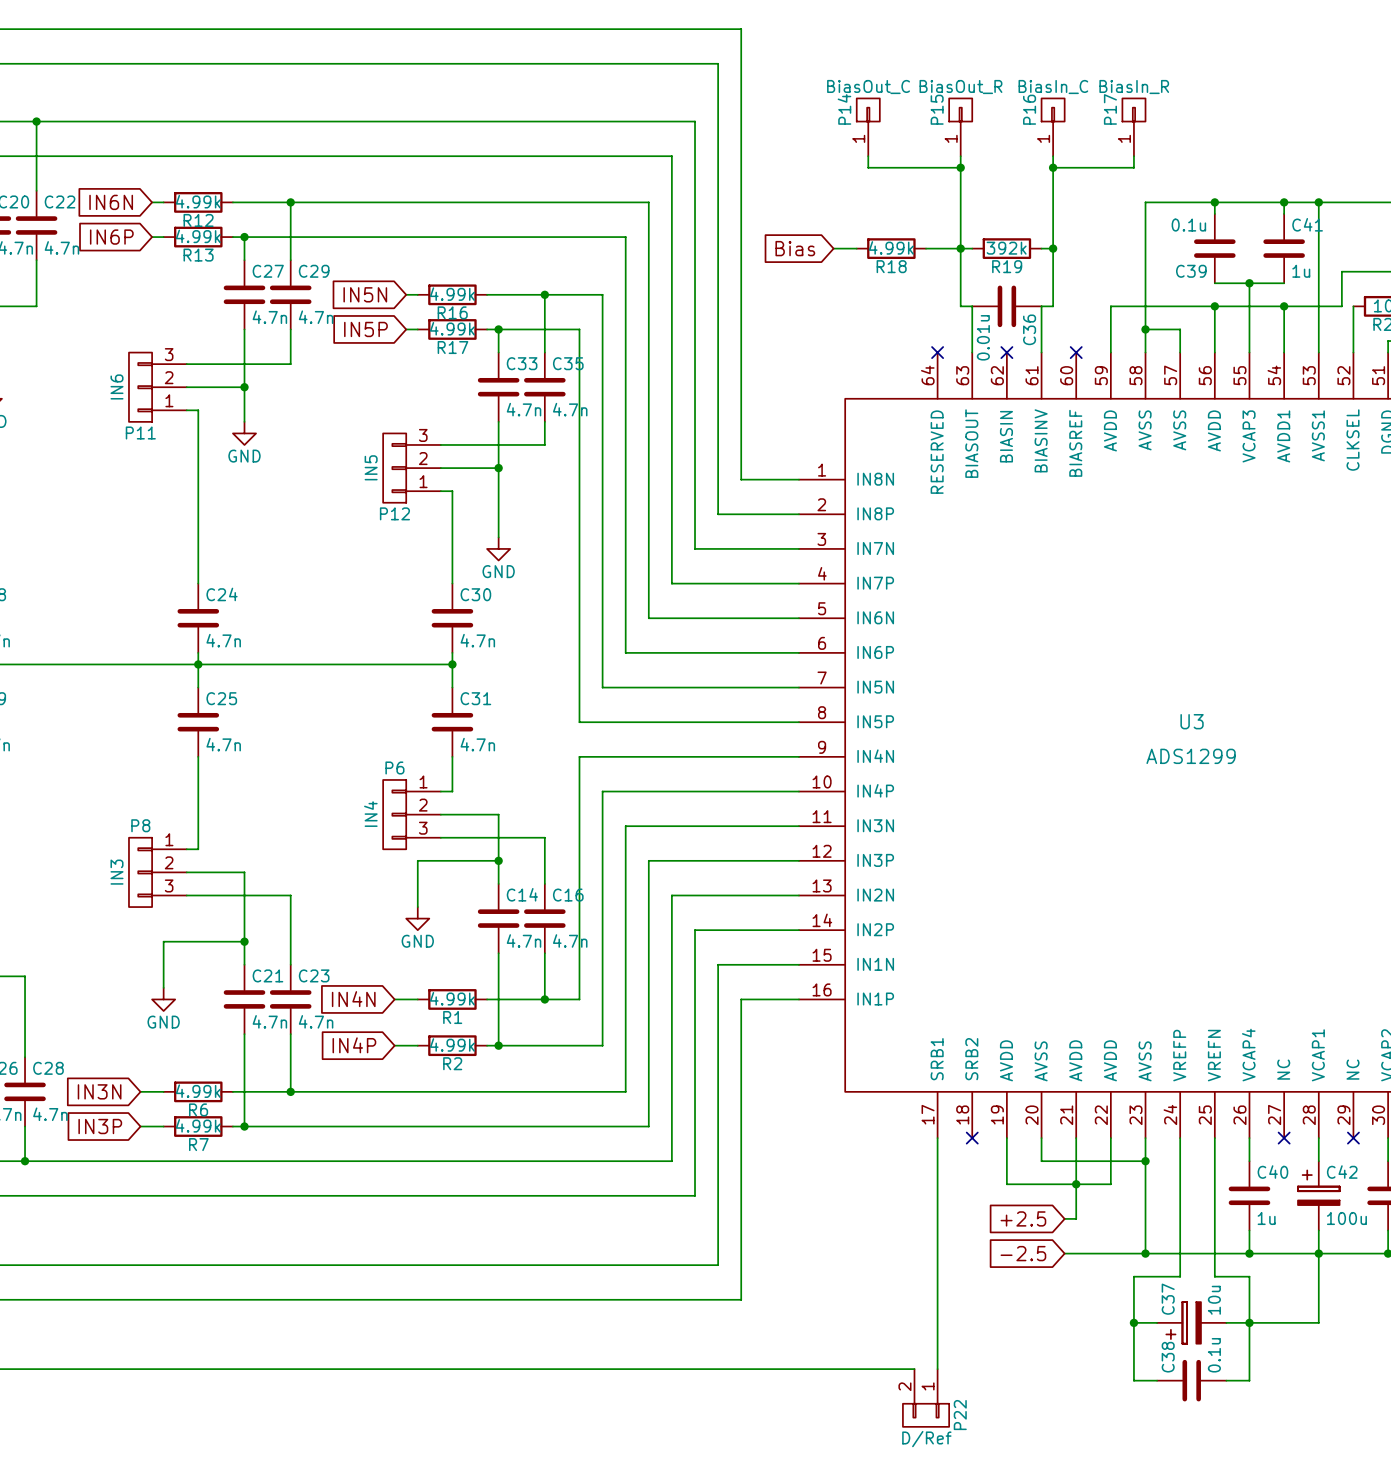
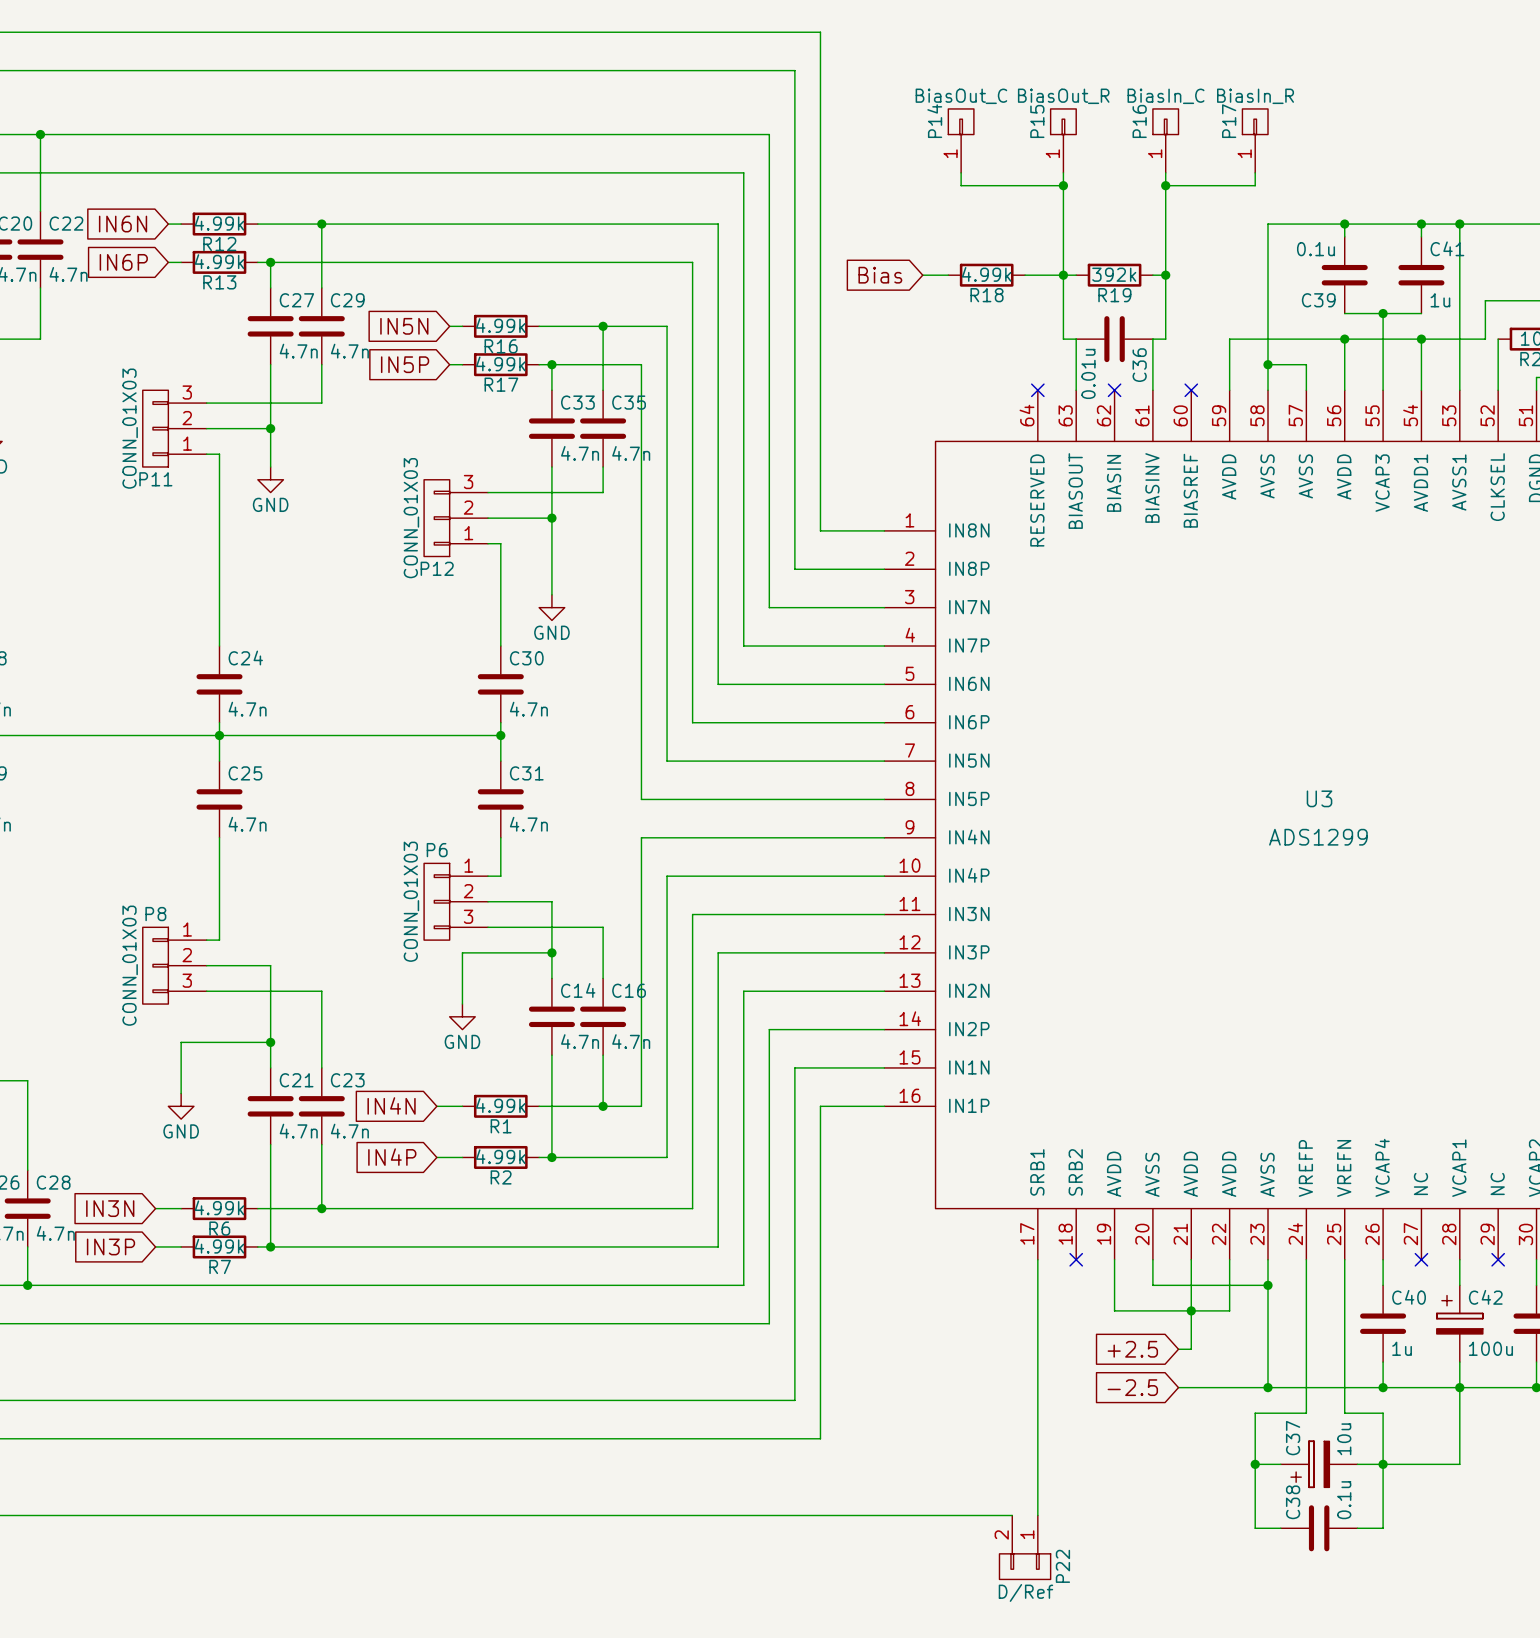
P11 value: IN6 (117, 386) -> CONN_01X03 (130, 428)
P12 value: IN5 (371, 467) -> CONN_01X03 (411, 518)
P6 value: IN4 (370, 814) -> CONN_01X03 (411, 901)
P8 value: IN3 (117, 872) -> CONN_01X03 (130, 965)

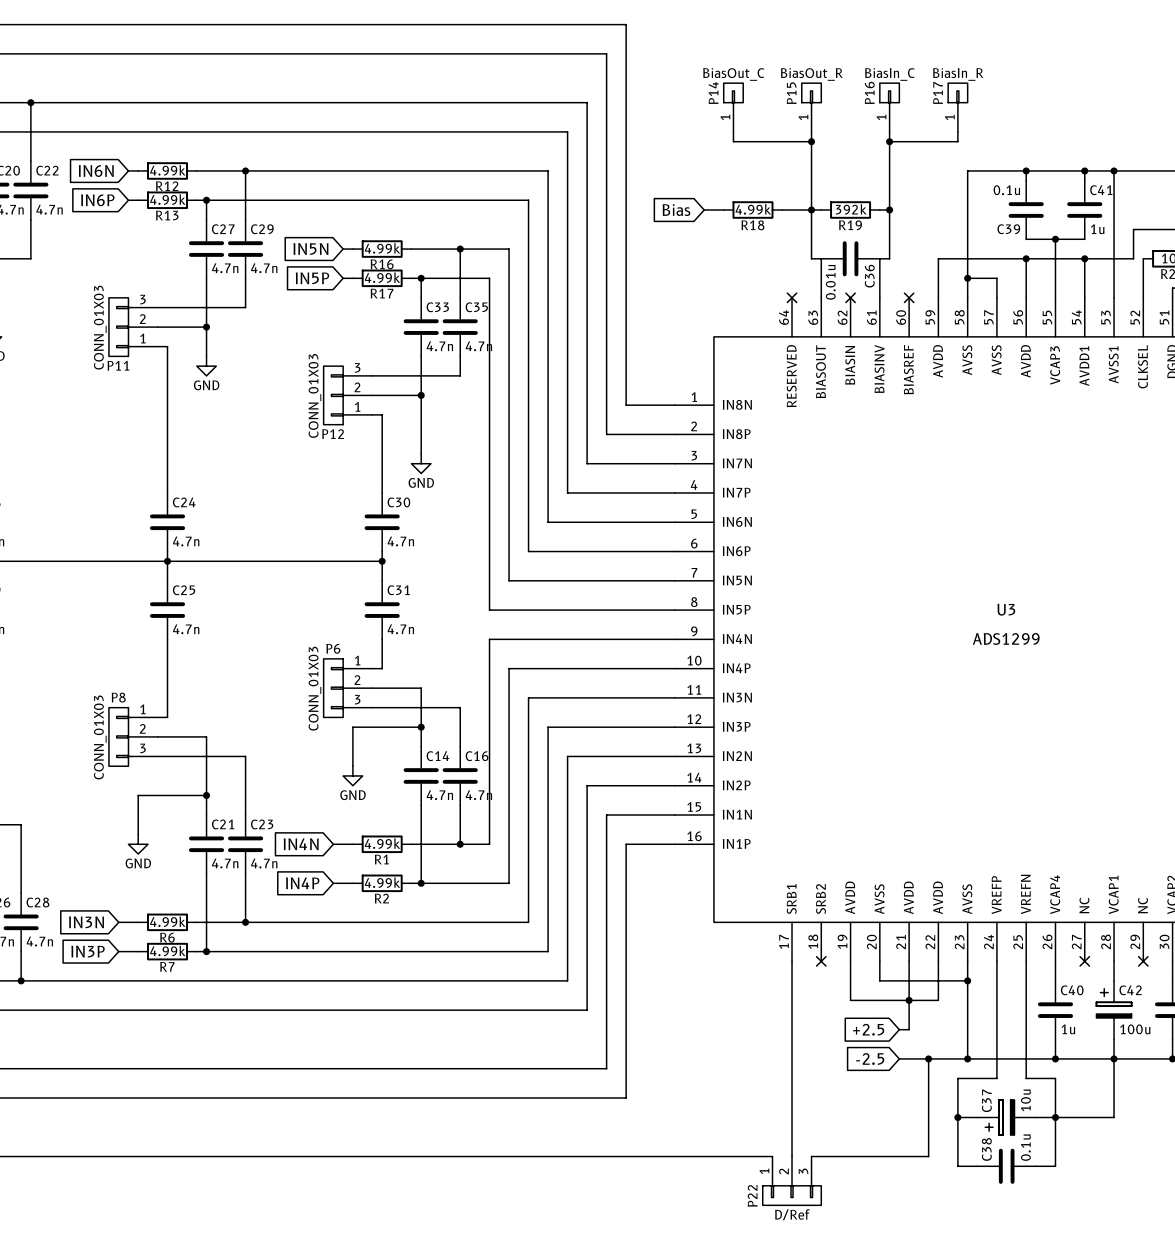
wire: none -> (928, 1058) (928, 1156) (811, 1156)
junction: none -> (928, 1058)
P22 symbol: [999, 1515, 1051, 1580] -> [762, 1156, 822, 1206]
P22 name position: P22 (1062, 1566) -> P22 (752, 1195)

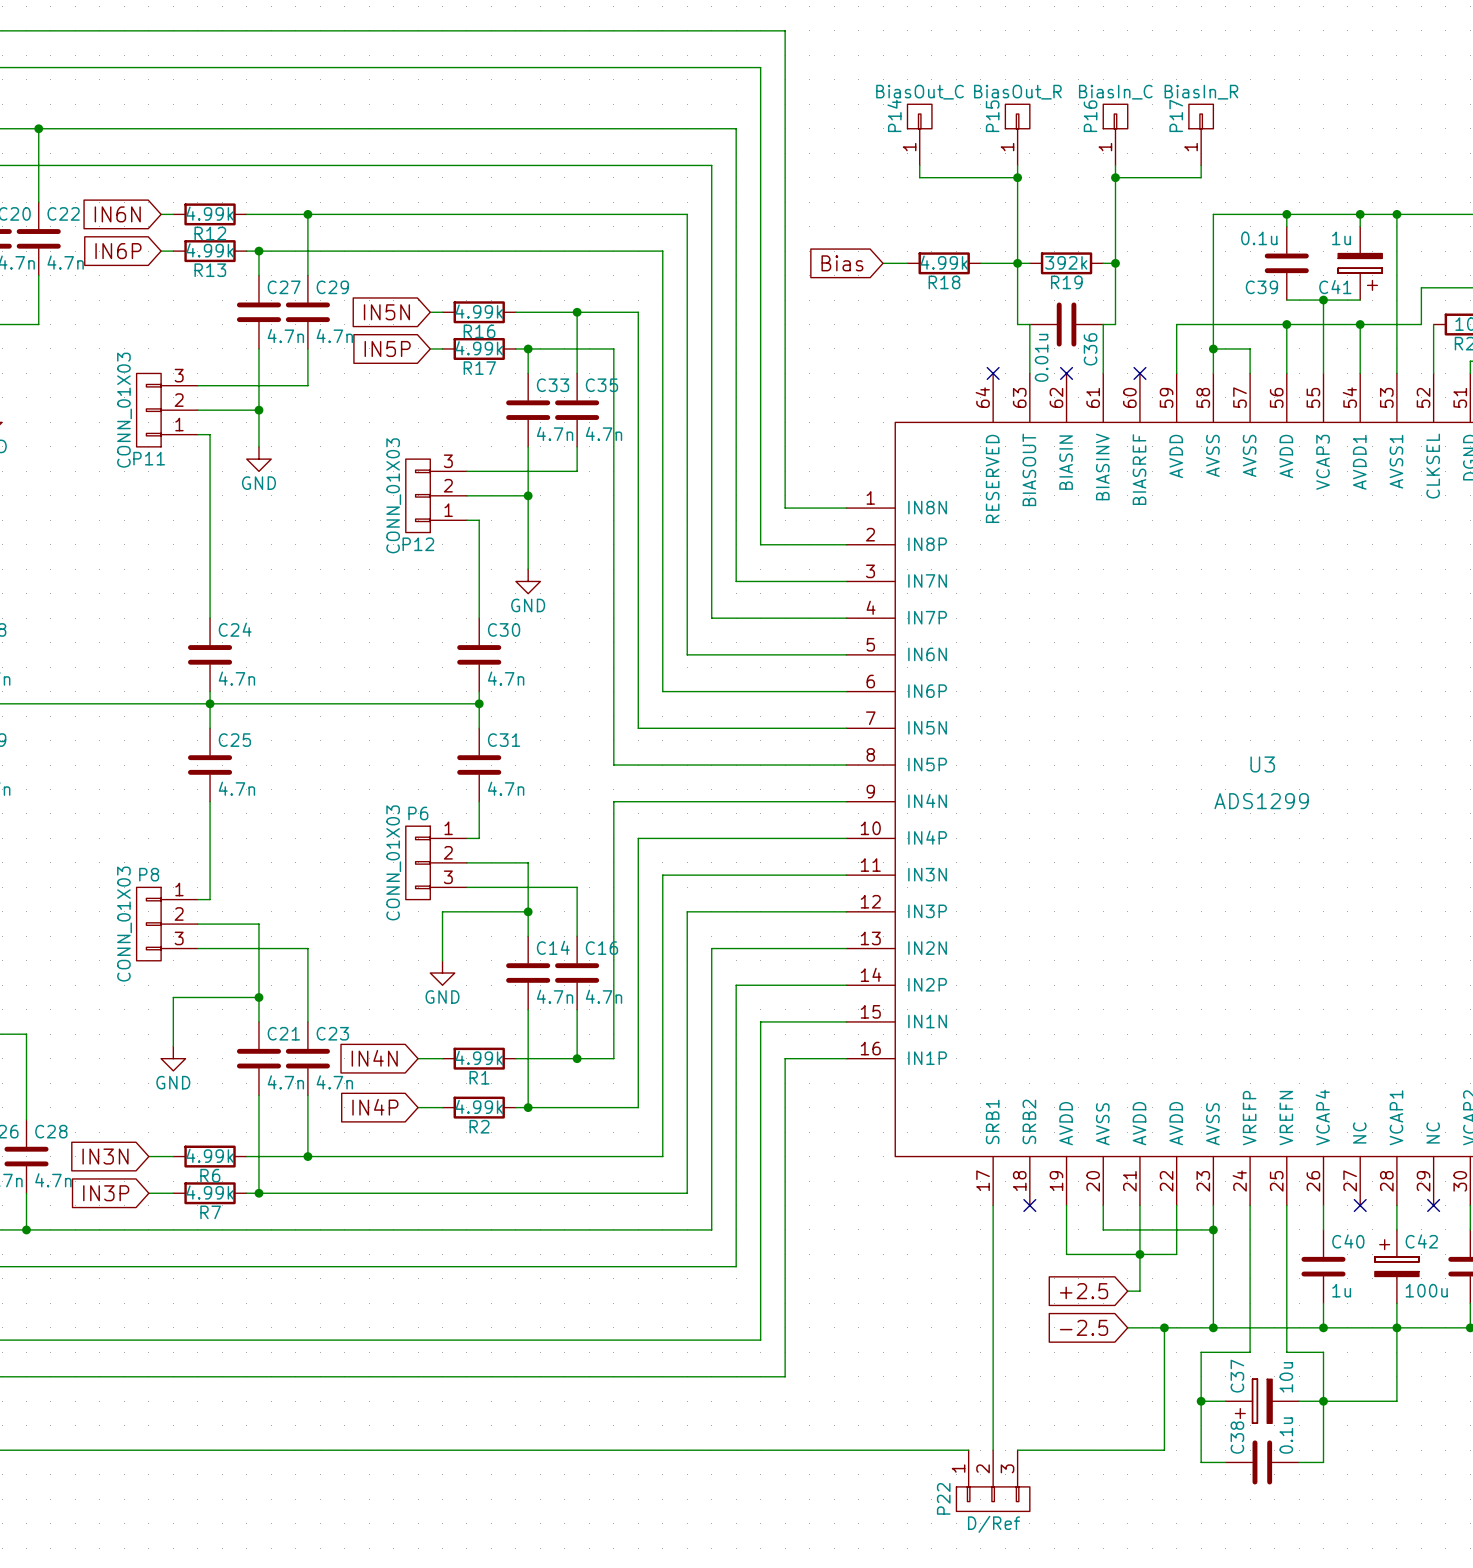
C41 symbol: [1067, 180, 1103, 240] -> [1338, 226, 1383, 301]
C41 name position: C41 (1101, 190) -> C41 (1335, 287)
C41 value position: 1u (1097, 229) -> 1u (1341, 238)

